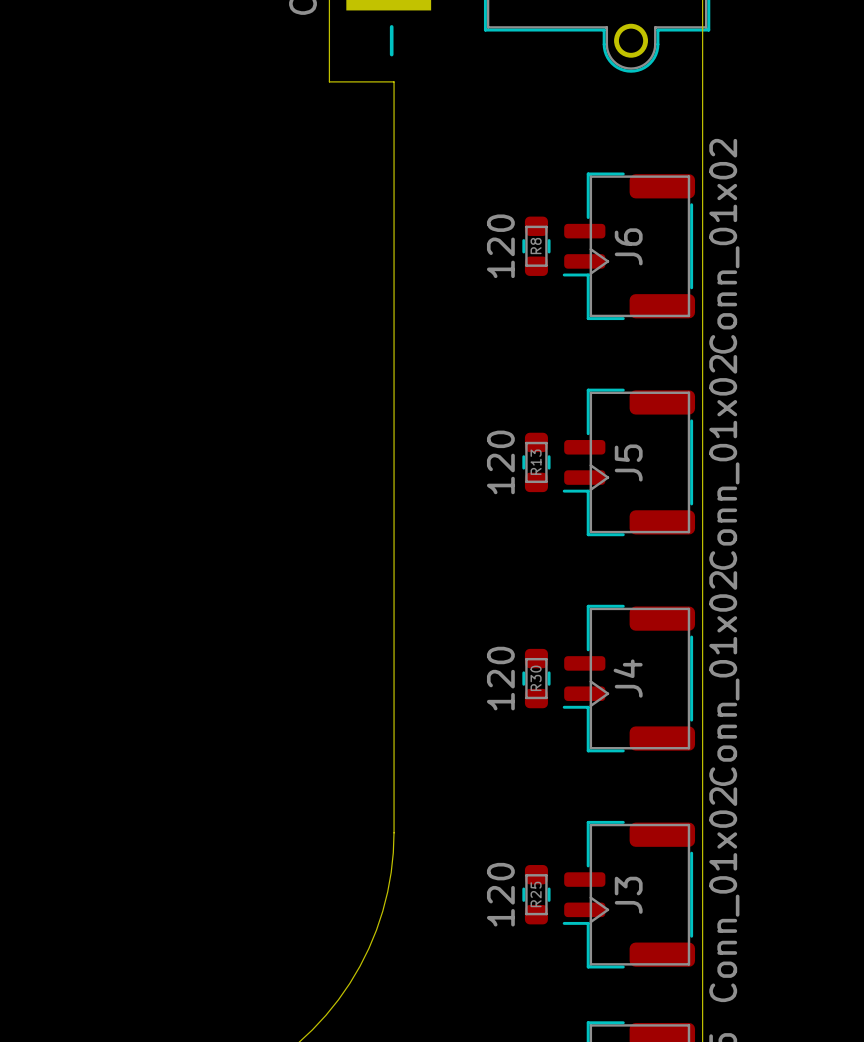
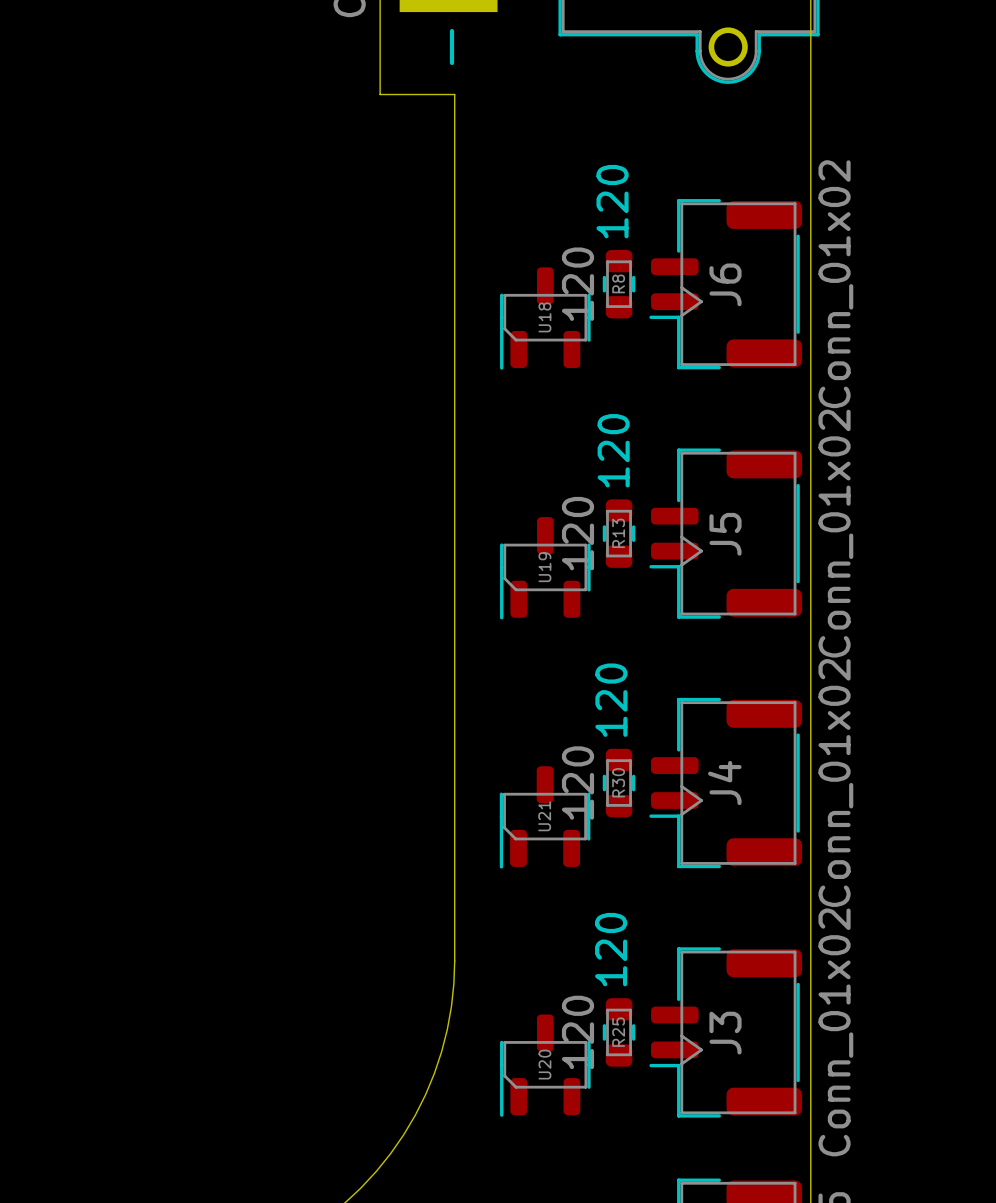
text: none -> 120 (612, 201)
U18: none -> (545, 318)
text: none -> 120 (613, 450)
U19: none -> (545, 568)
text: none -> 120 (611, 700)
U21: none -> (545, 817)
text: none -> 120 (611, 949)
U20: none -> (545, 1065)

